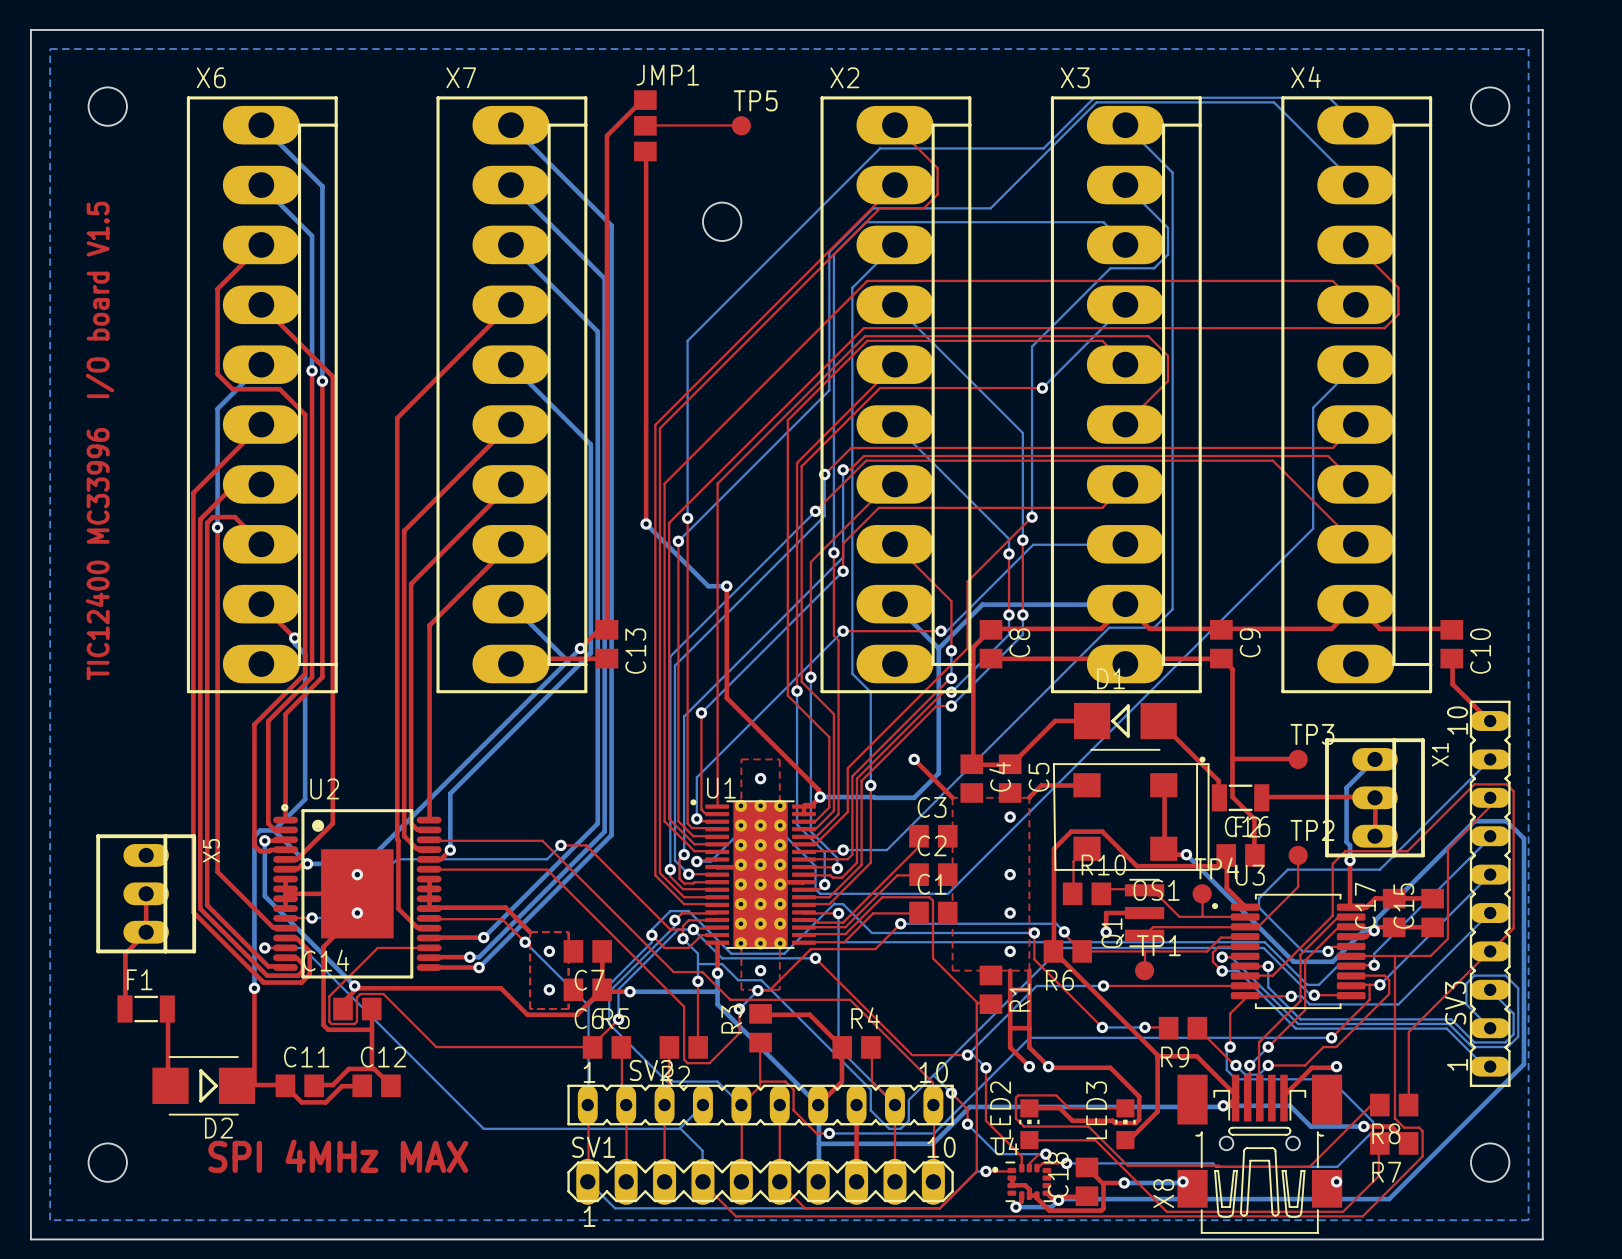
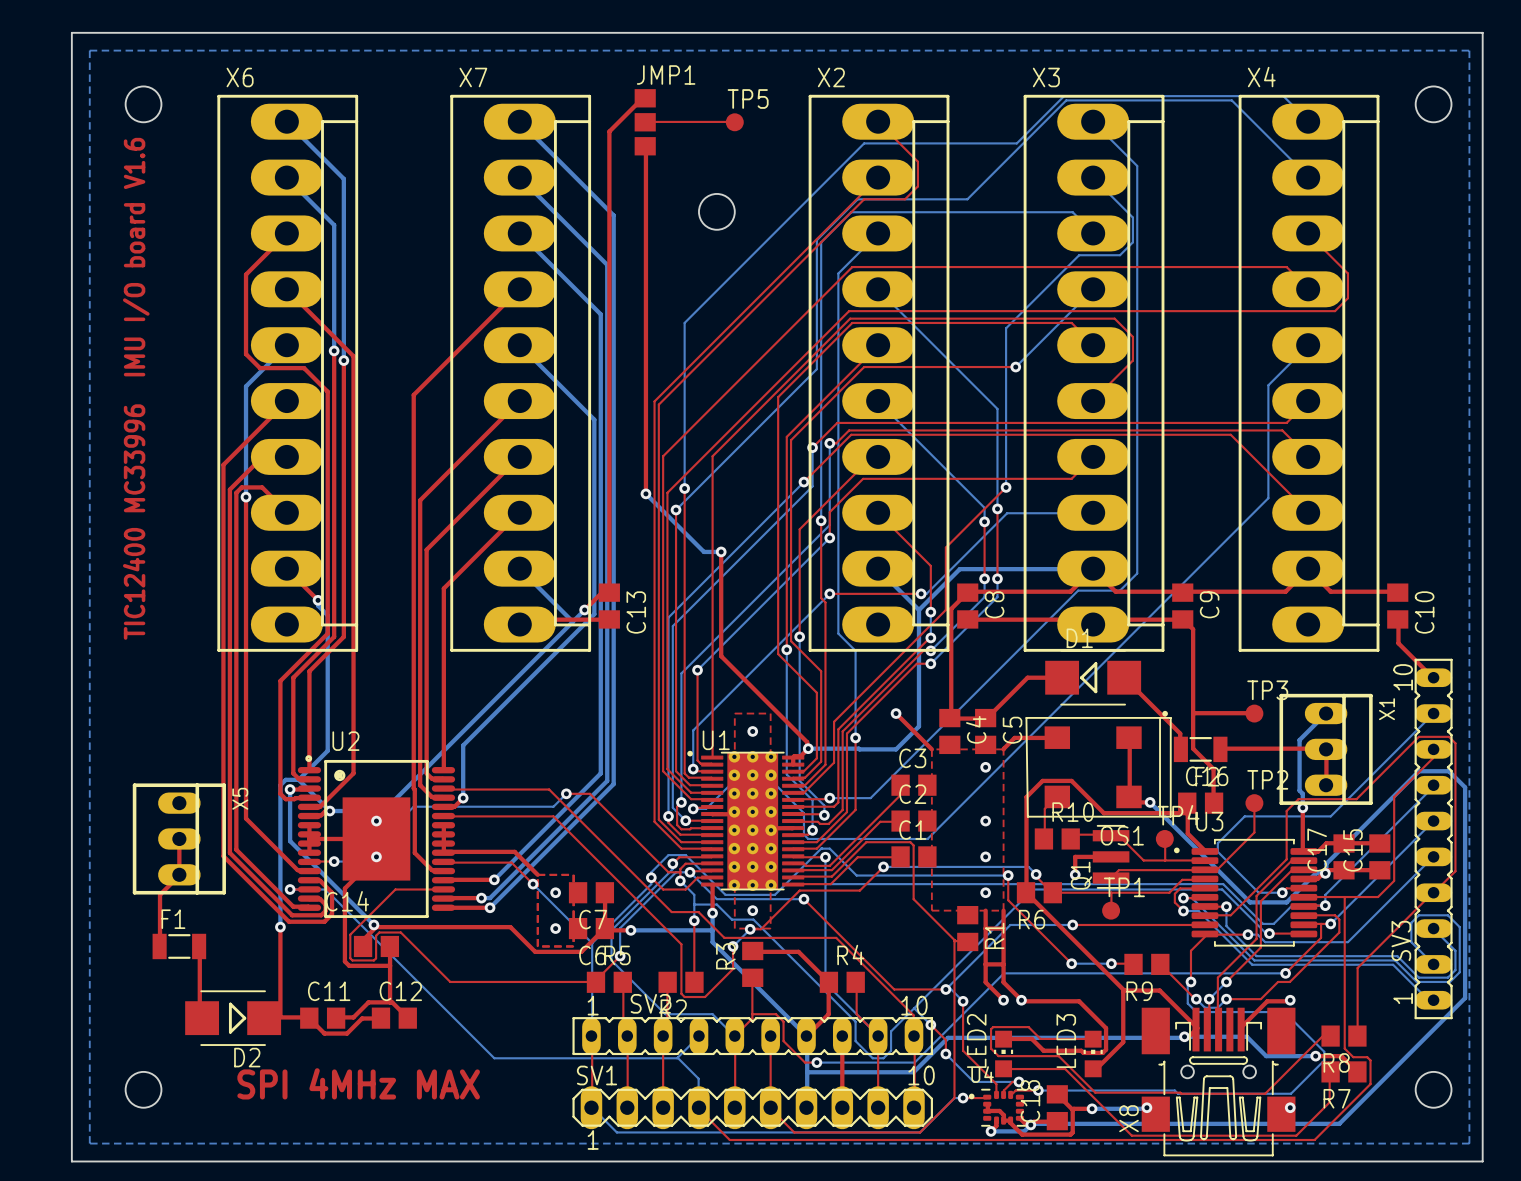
text: TIC12400 MC33996 I/O board V1.5 (99, 441) -> TIC12400 MC33996 IMU I/O board V1.6 (136, 388)

